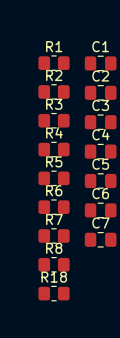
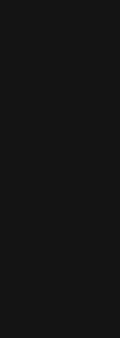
R1: (53, 63) -> none
C1: (100, 63) -> none
R2: (53, 91) -> none
C2: (100, 92) -> none
R3: (53, 120) -> none
C3: (100, 122) -> none
R4: (53, 149) -> none
C4: (100, 151) -> none
R5: (53, 178) -> none
C5: (100, 180) -> none
R6: (53, 207) -> none
C6: (100, 210) -> none
R7: (53, 235) -> none
C7: (100, 239) -> none
R8: (53, 264) -> none
R18: (53, 293) -> none

